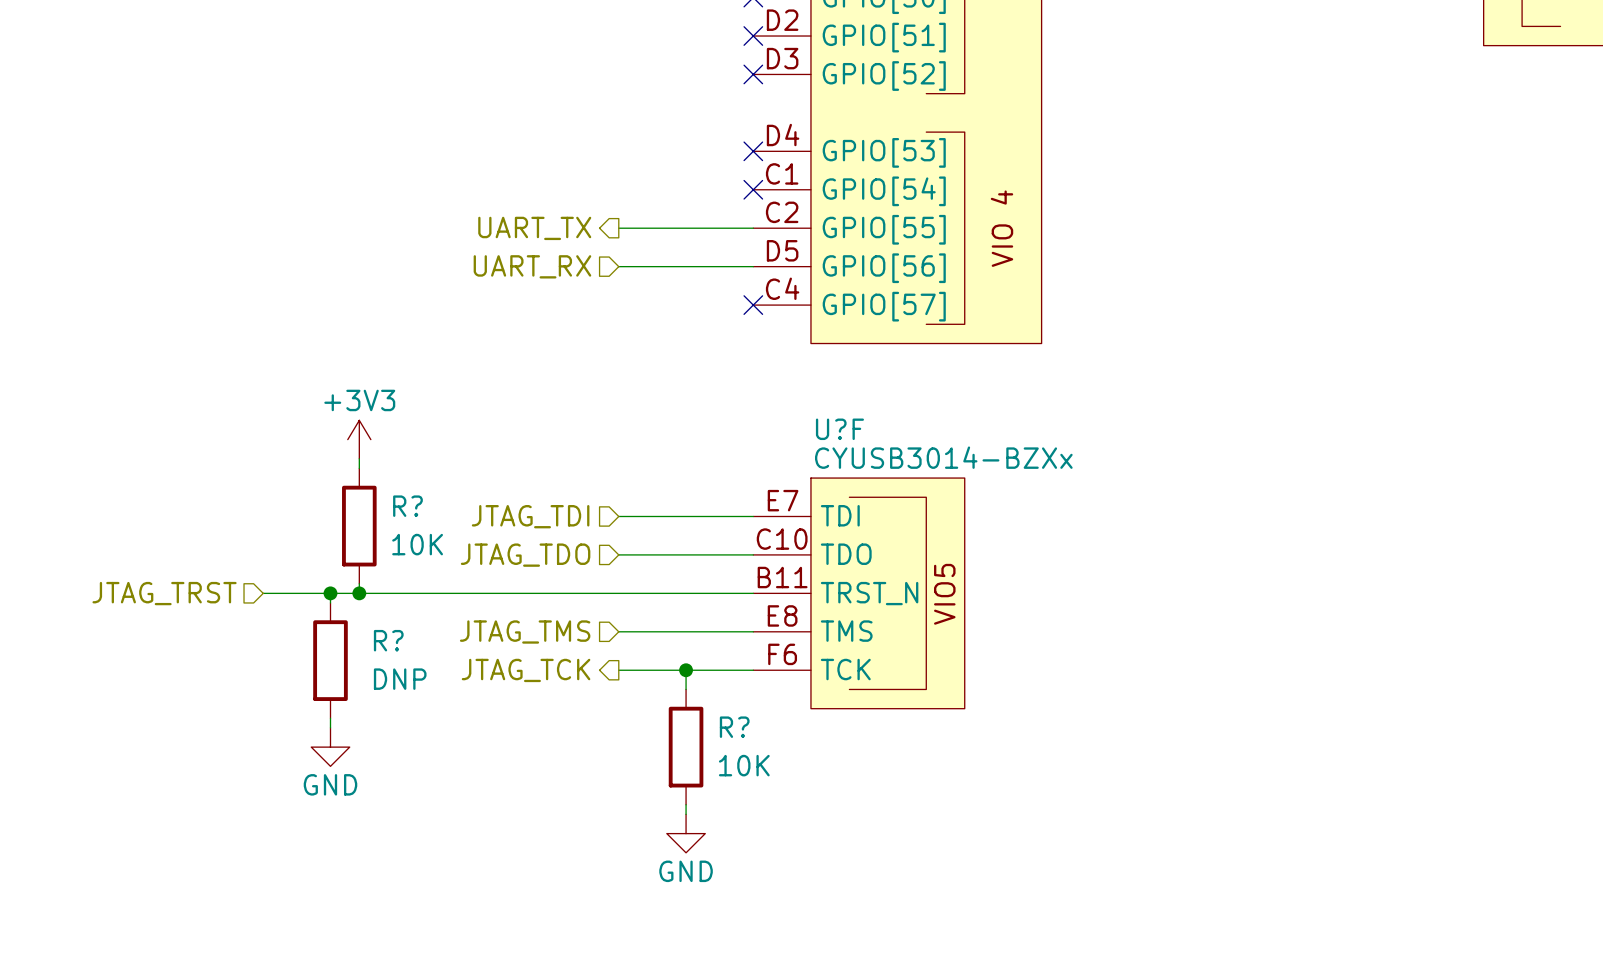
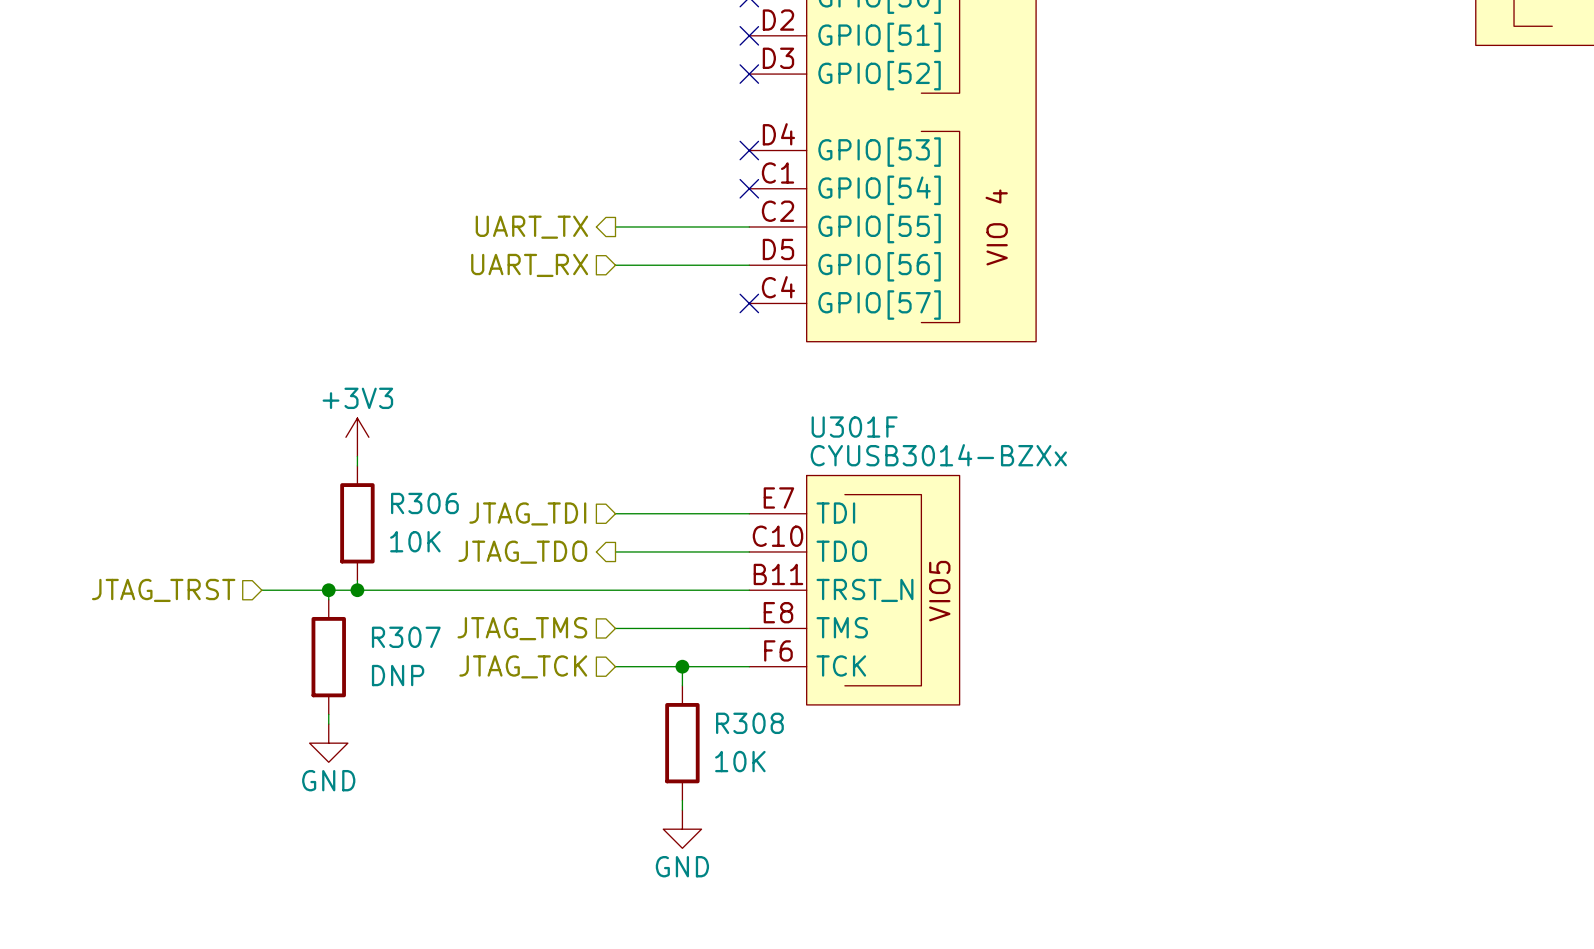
U?F name: U?F (839, 429) -> U301F (854, 427)
R? name: R? (407, 506) -> R306 (424, 503)
hierarchical label shape: input (525, 555) -> output (522, 552)
R? name: R? (388, 640) -> R307 (406, 637)
hierarchical label shape: output (526, 670) -> input (523, 666)
R? name: R? (734, 727) -> R308 (749, 723)

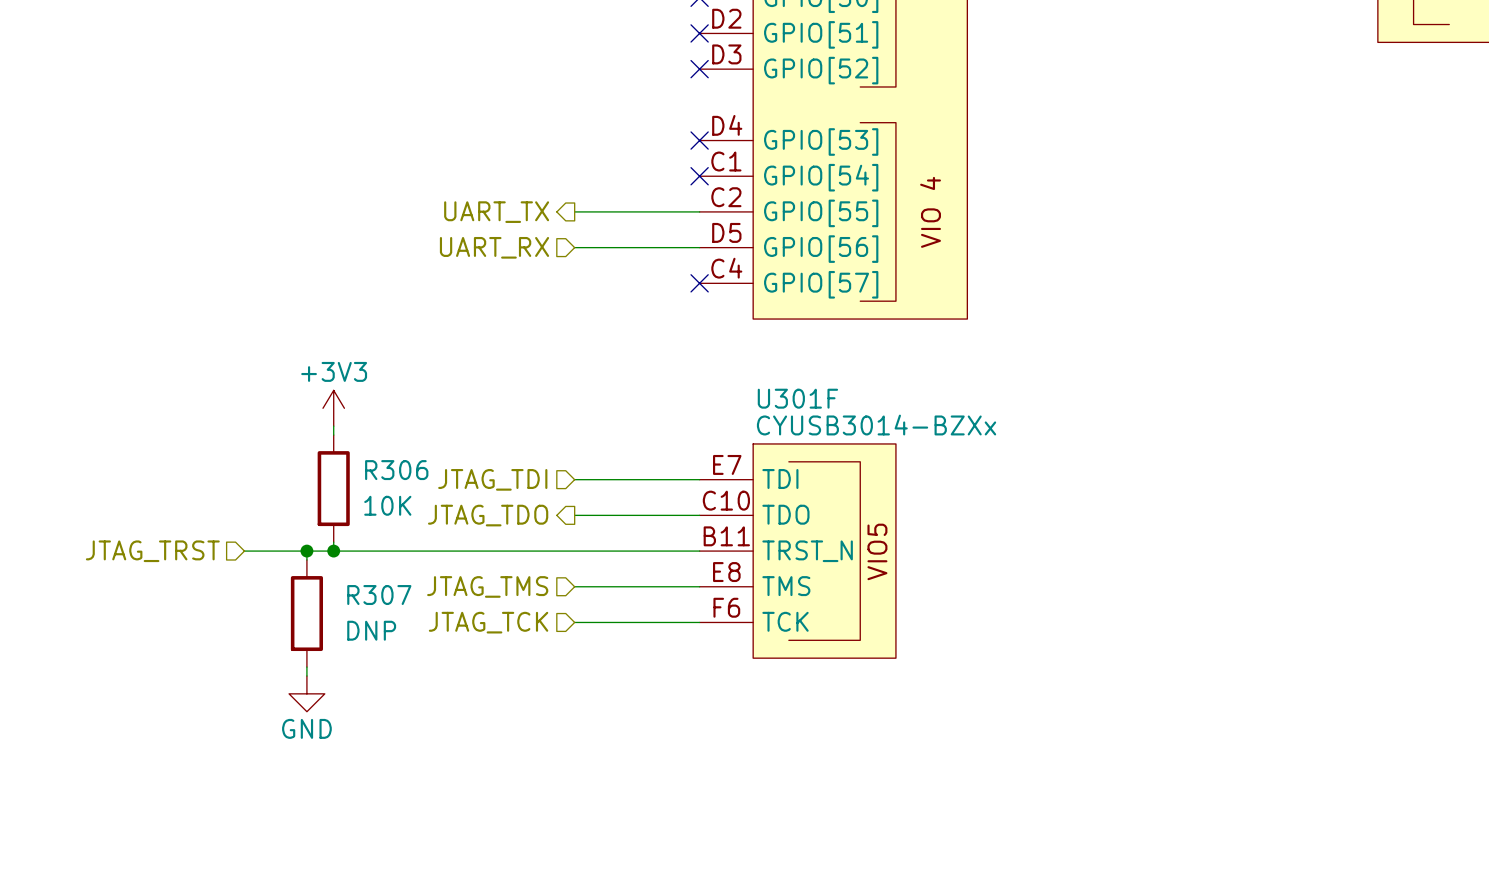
wire: (682, 666) (682, 685) -> none
junction: (682, 666) -> none
R308: 10K (682, 743) -> none
wire: (682, 800) (682, 810) -> none
power symbol: GND (682, 829) -> none

